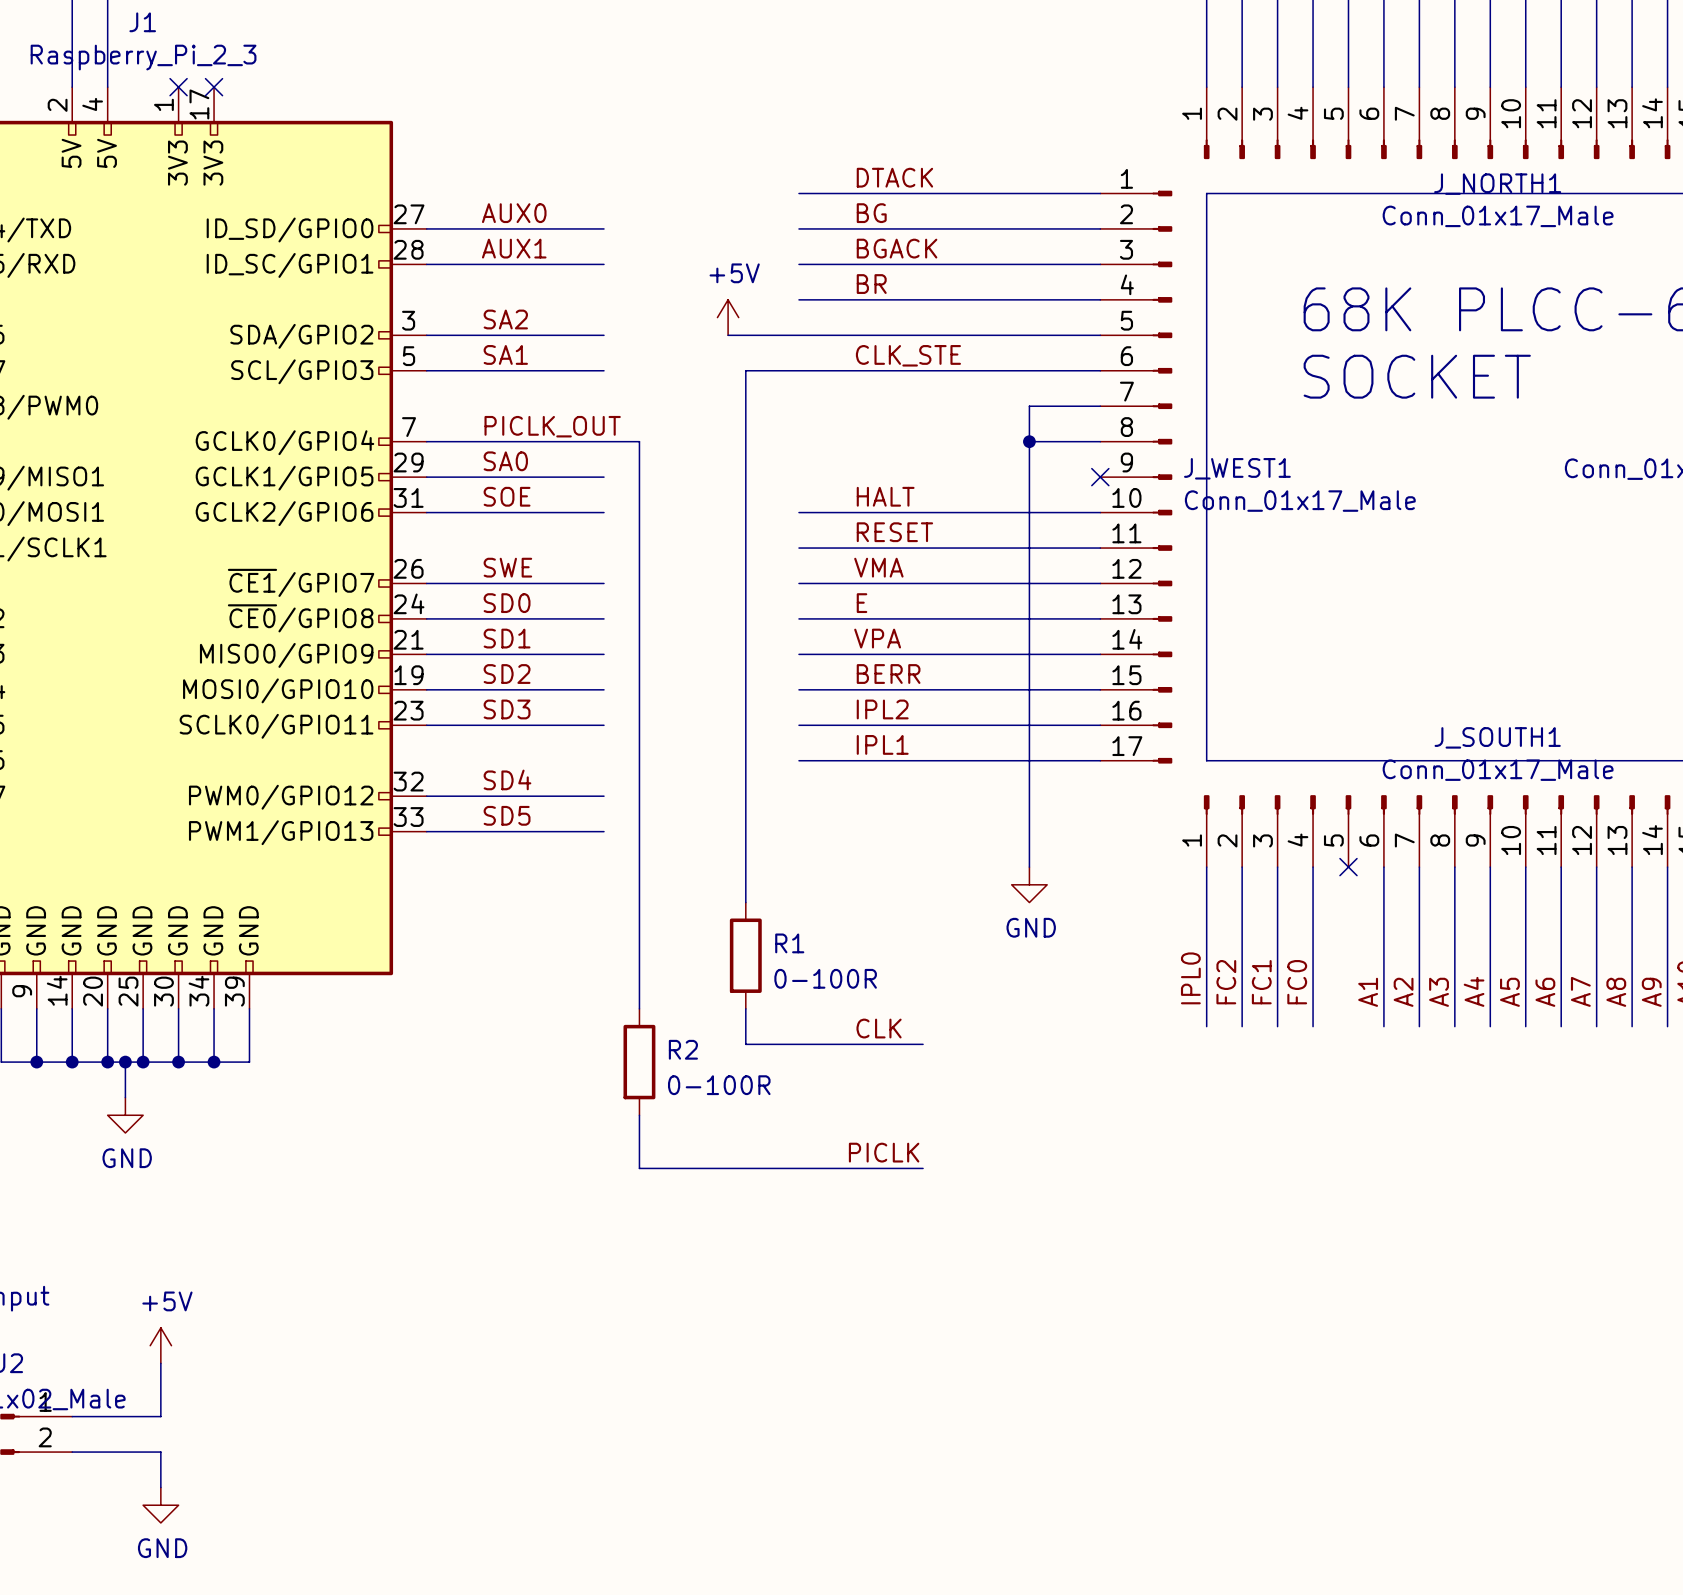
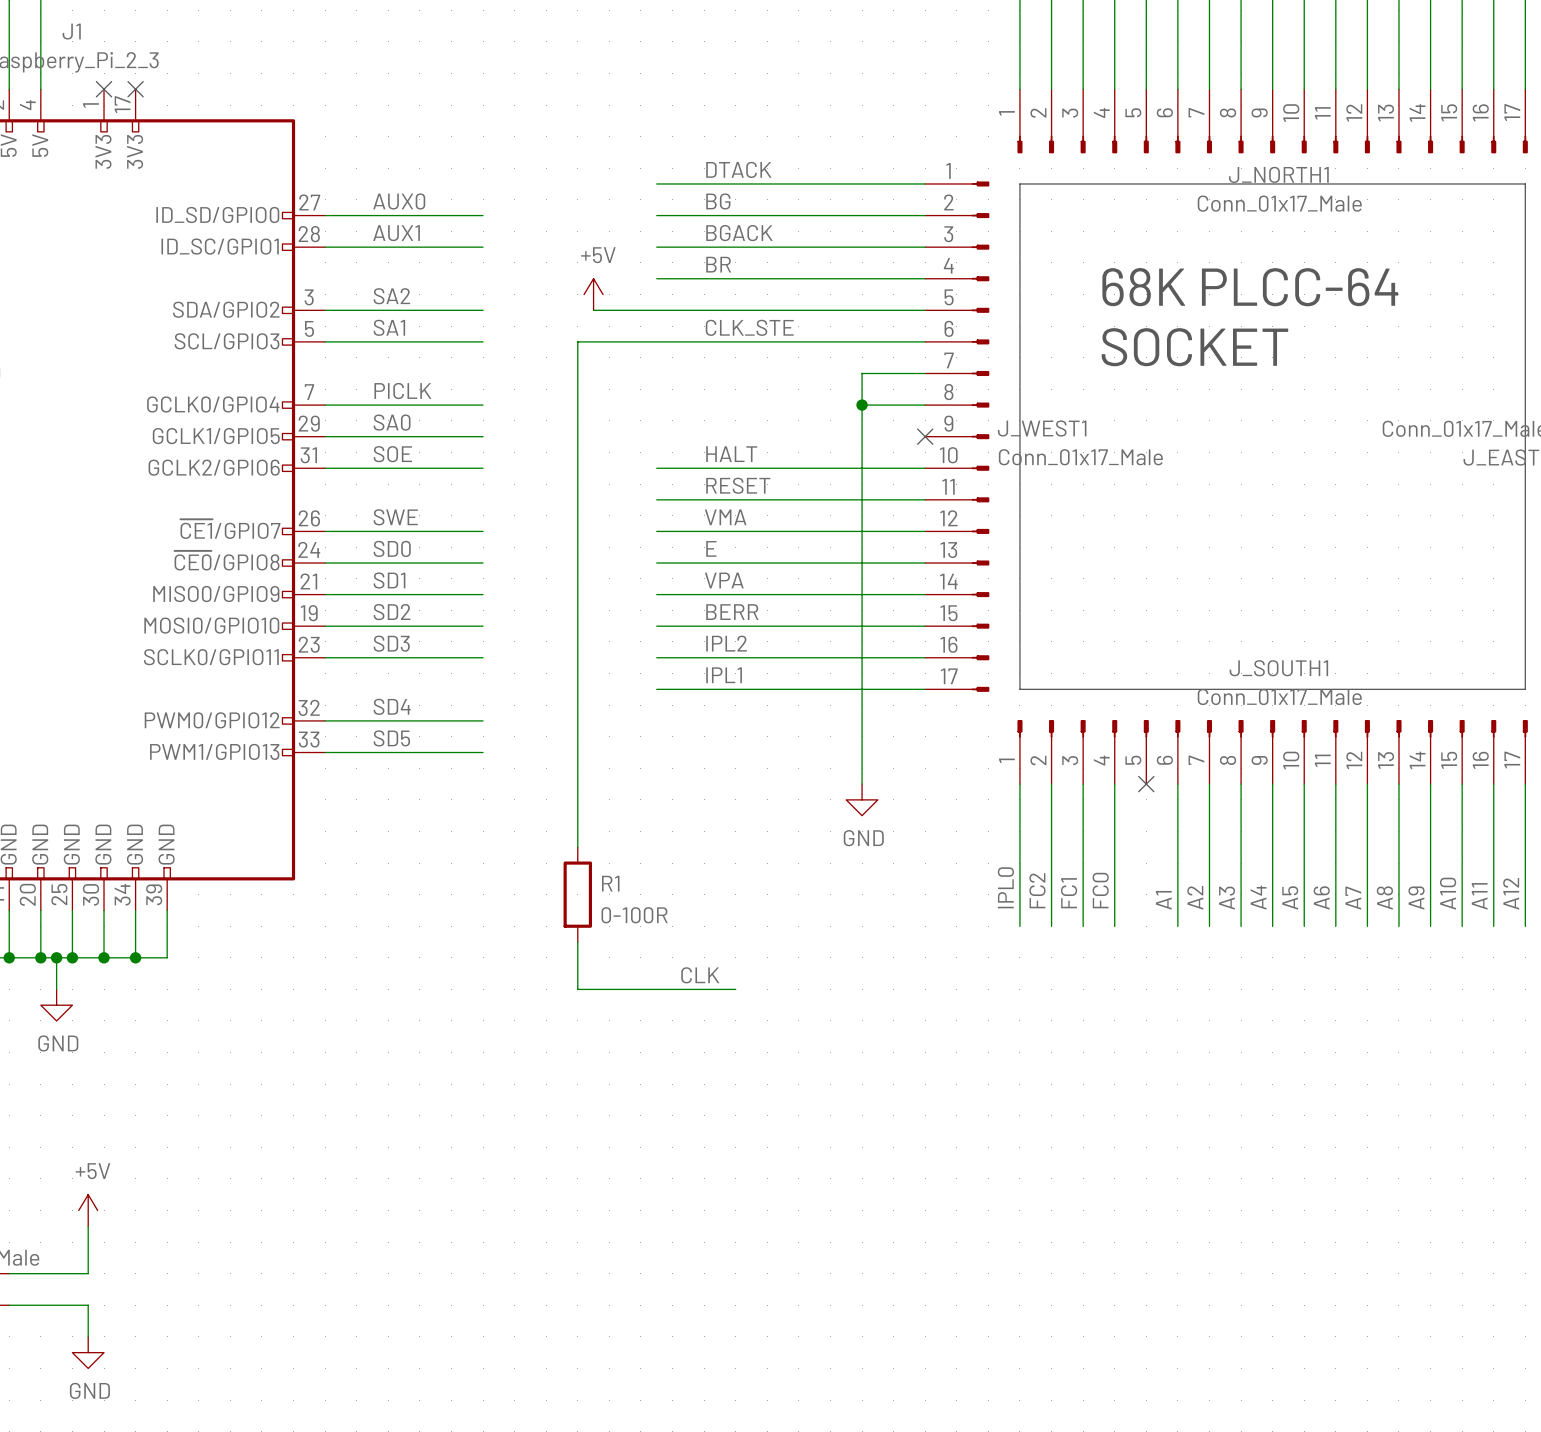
wire: (745, 370) (745, 902) -> (609, 341) (577, 341) (577, 847)
label: PICLK_OUT (552, 426) -> PICLK (402, 391)
wire: (604, 441) (639, 441) (639, 1008) -> none
R1 position: (745, 955) -> (577, 894)
wire: (745, 1008) (745, 1044) (923, 1044) -> none
label position: CLK (879, 1028) -> CLK (700, 975)
wire: none -> (577, 942) (577, 989) (735, 989)
R2: 0-100R (639, 1062) -> none
wire: (639, 1115) (639, 1168) (923, 1168) -> none
label: PICLK (884, 1152) -> none

